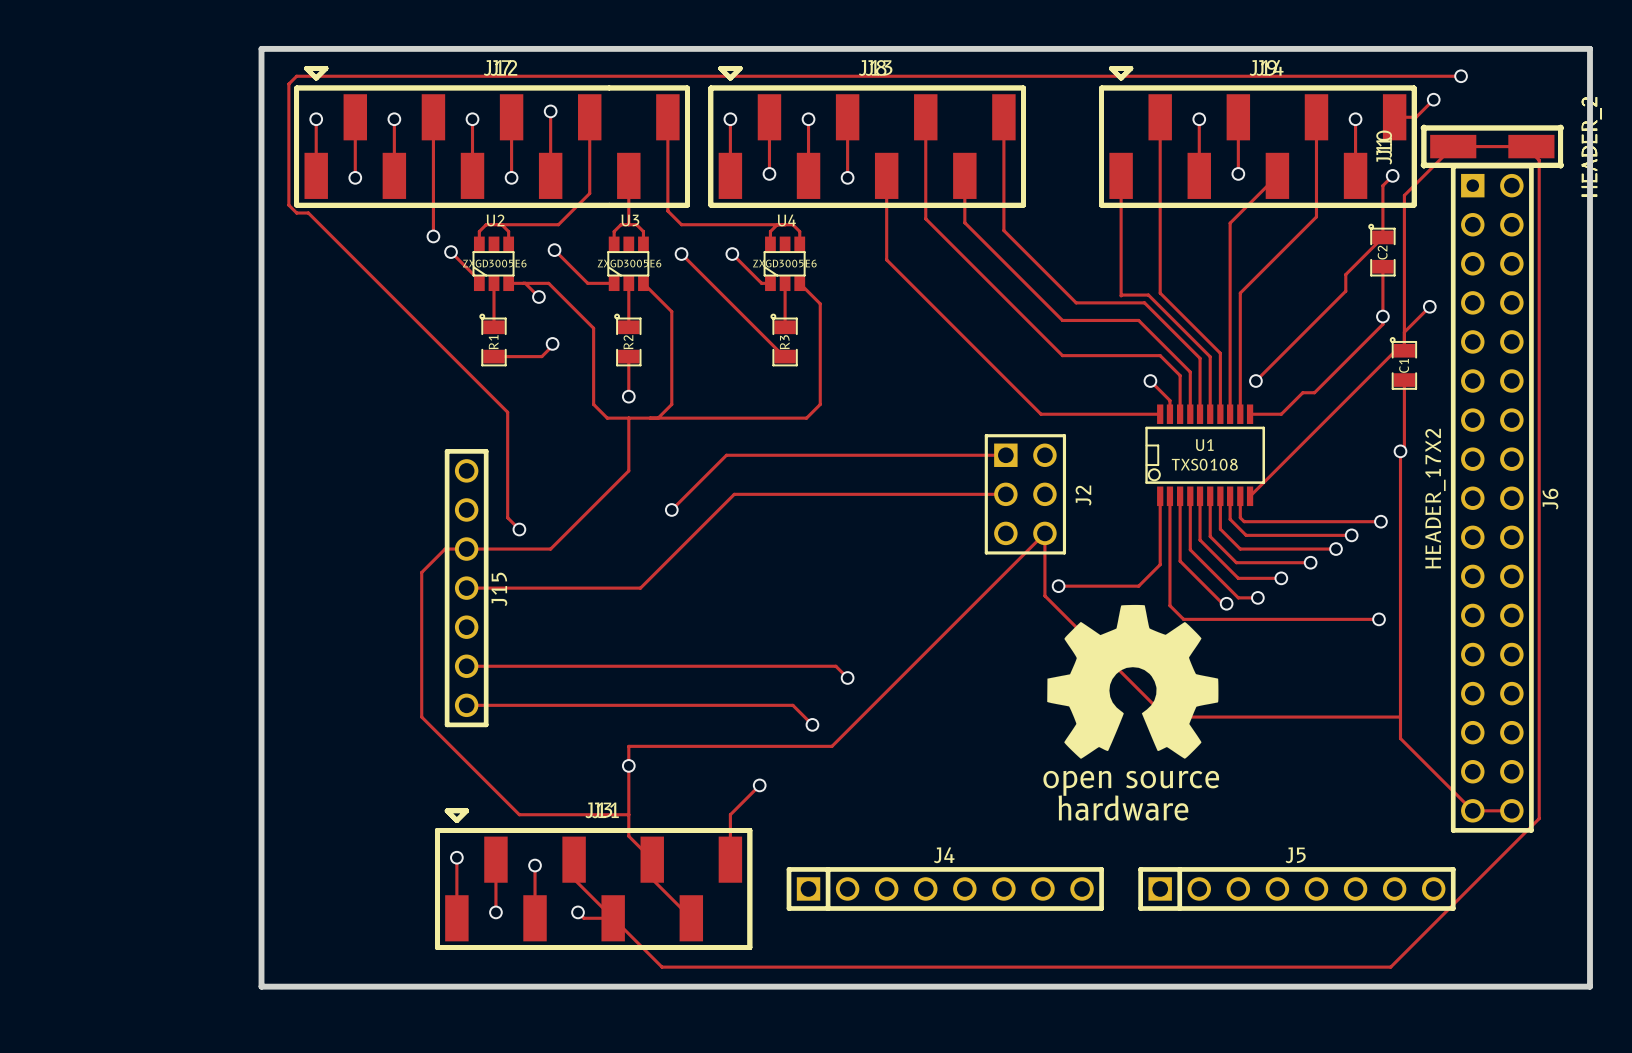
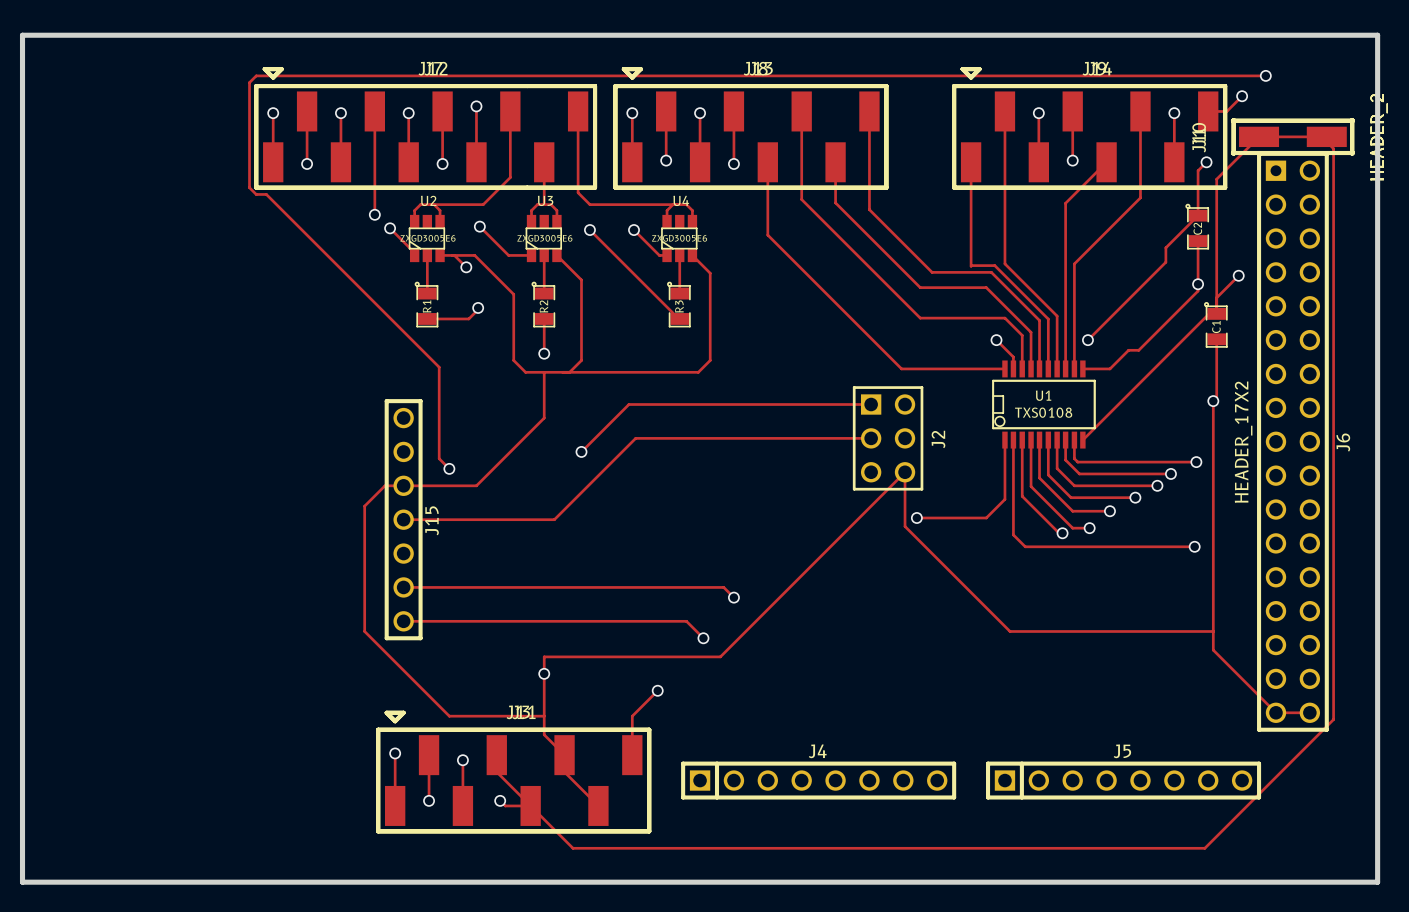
board edge: (1590, 48) (261, 48) (261, 986) (1590, 986) -> (1377, 52) (1377, 35) (22, 35) (22, 882) (1377, 882) (1377, 865)
drawing: [1047, 604, 1219, 759] -> none

